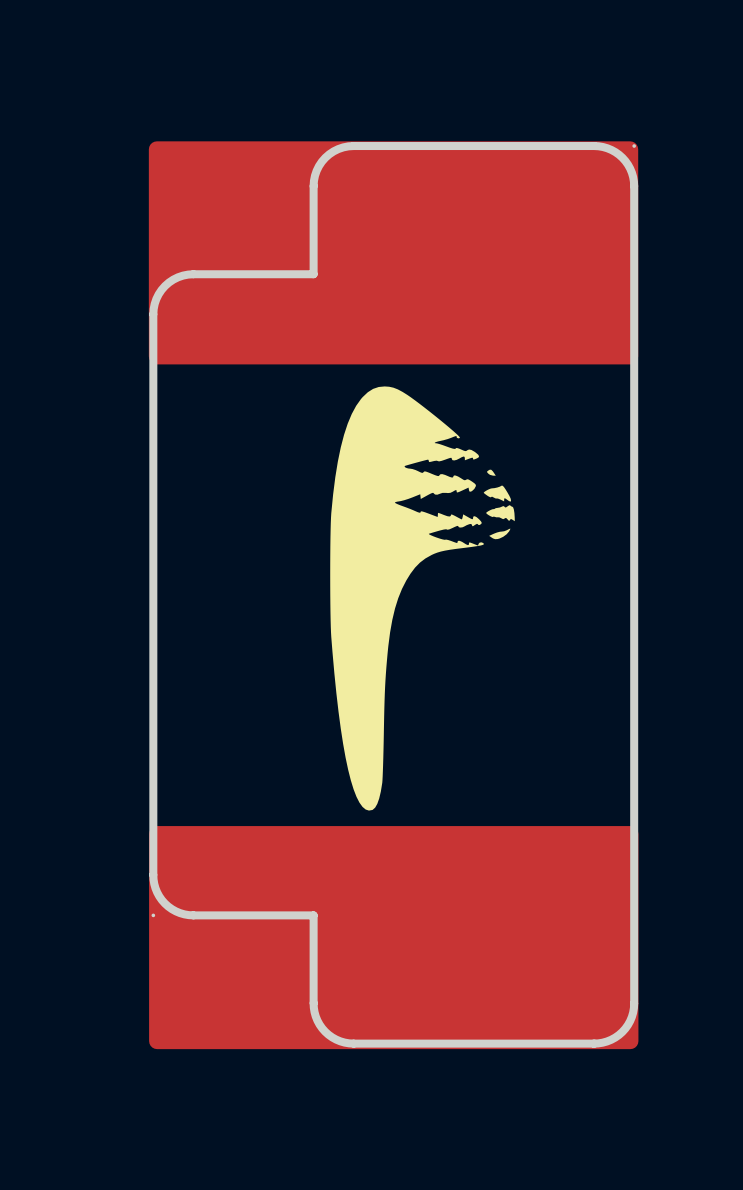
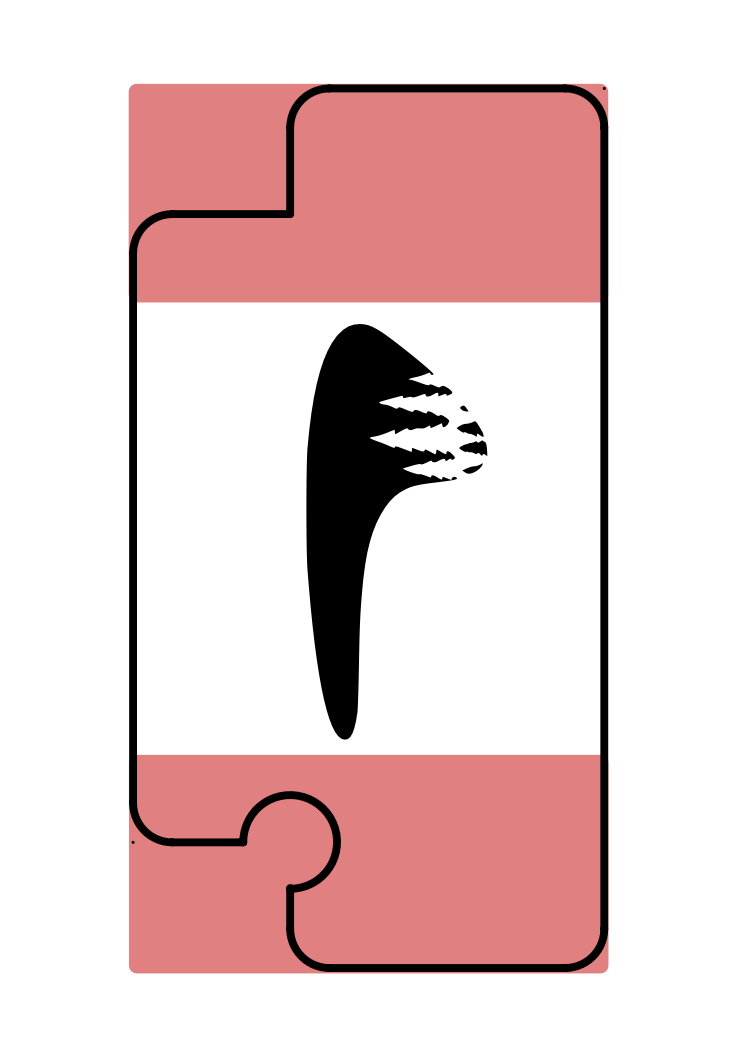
board edge: (265, 915) (313, 915) (313, 961) -> (243, 842) (244, 830) (251, 815) (259, 806) (274, 797) (297, 795) (308, 798) (323, 808) (335, 828) (337, 839) (334, 857) (329, 867) (317, 880) (307, 885) (290, 888)

